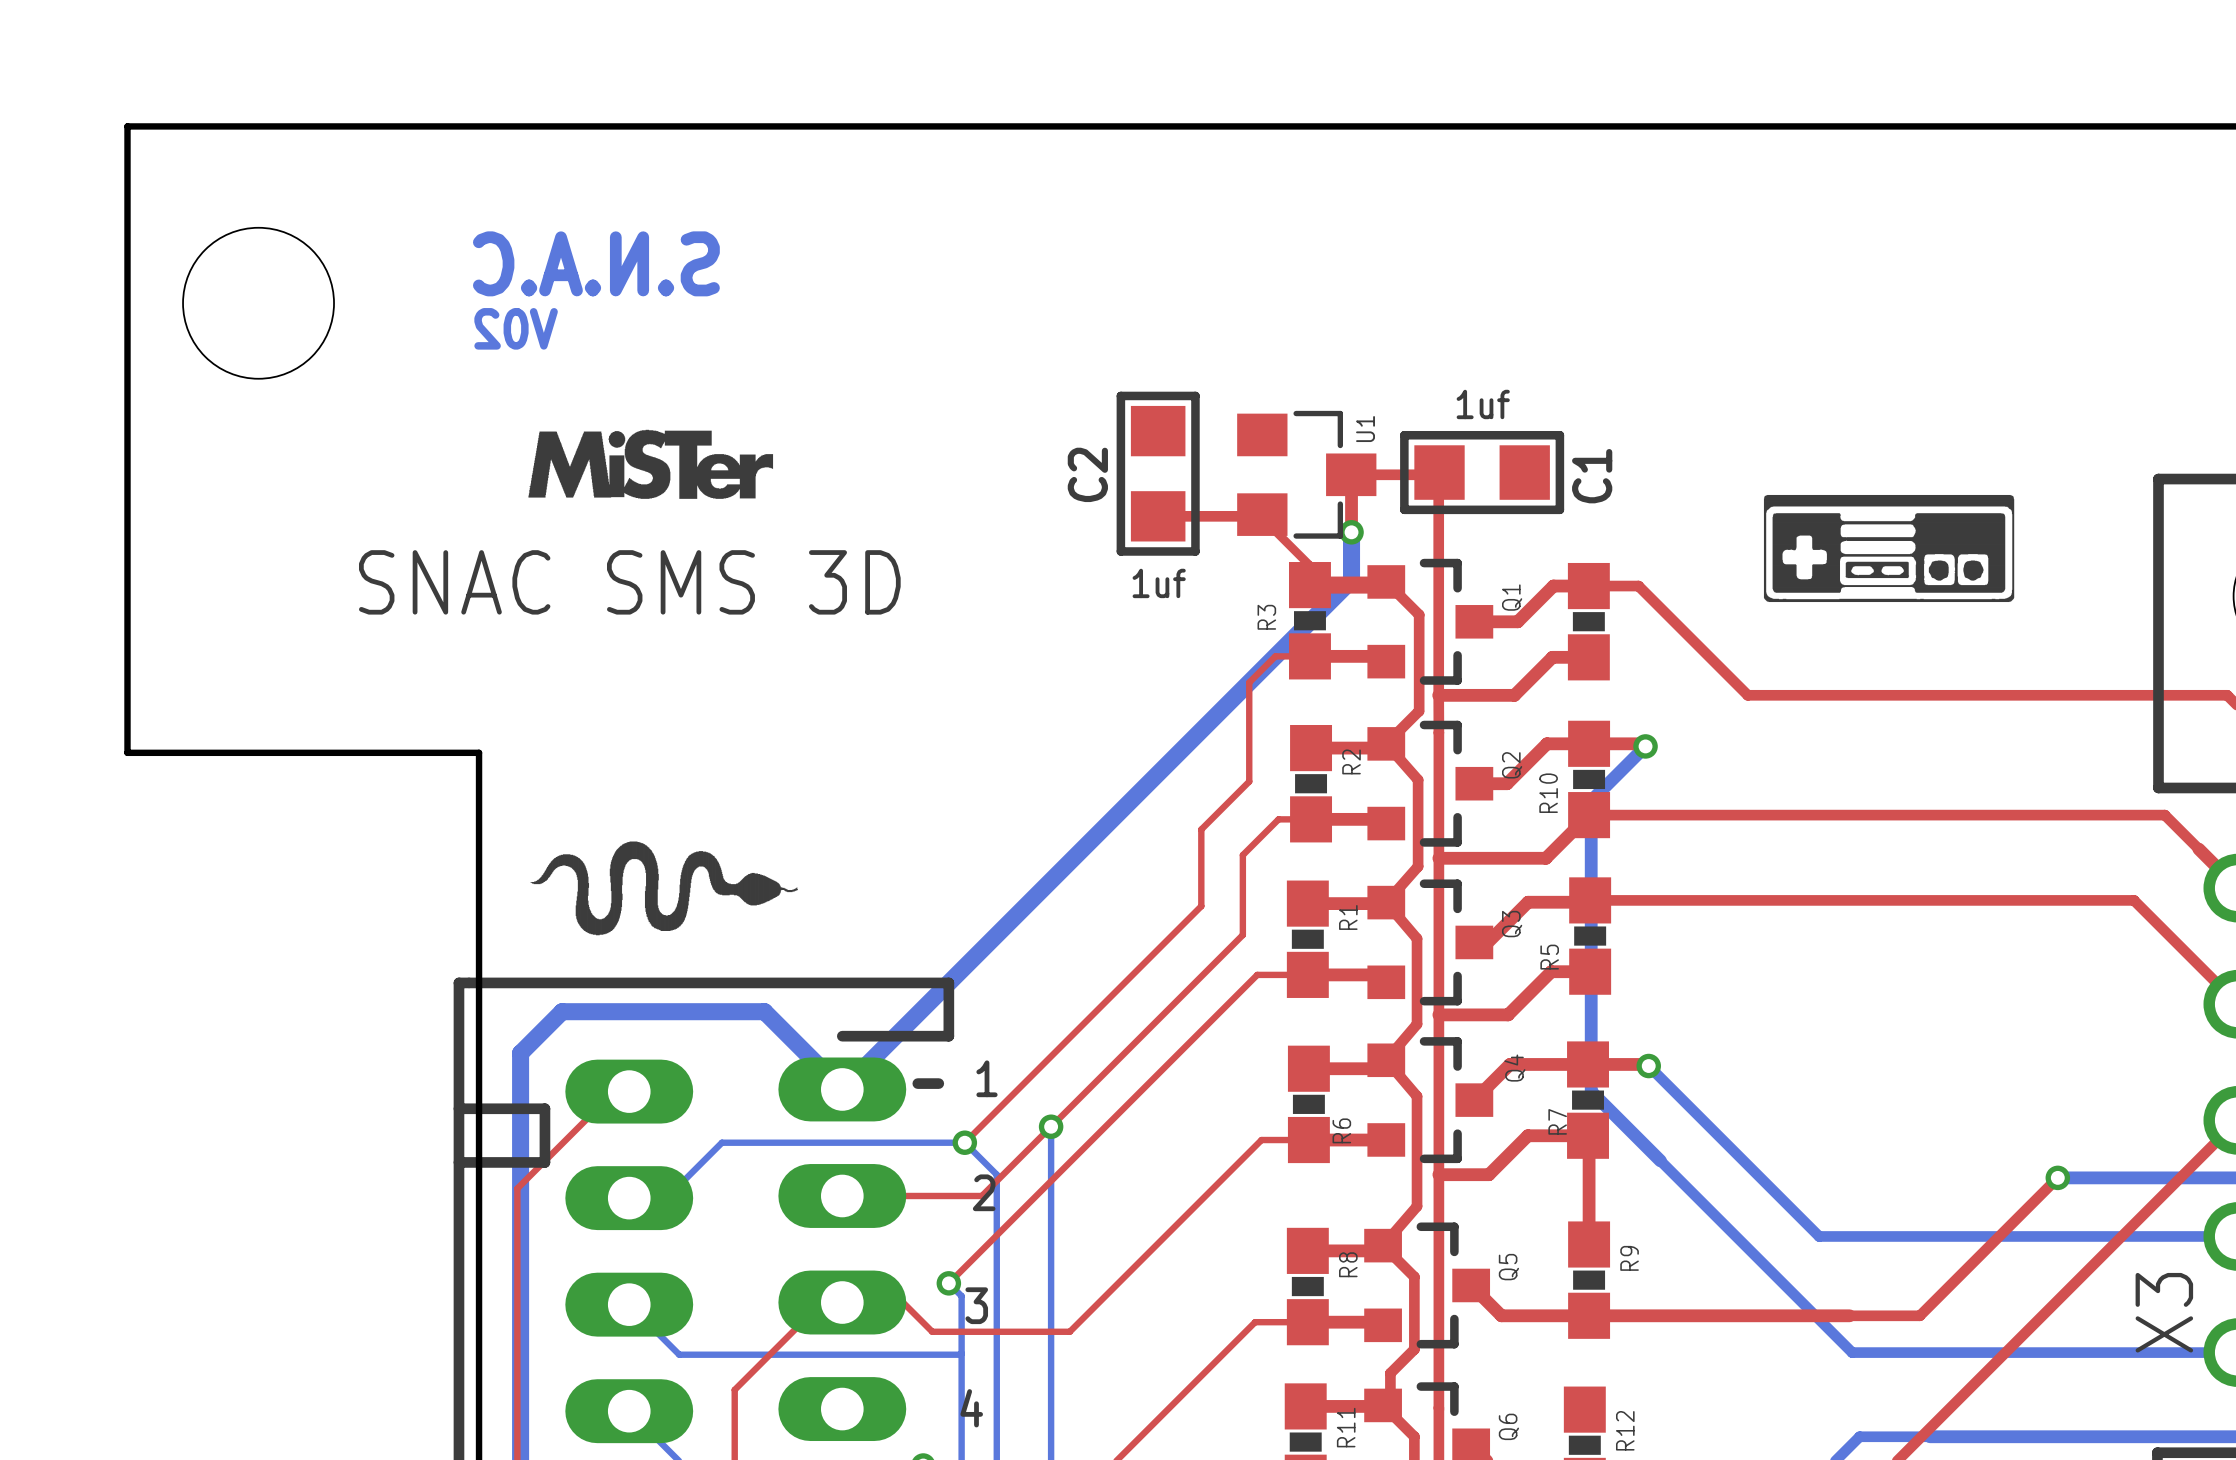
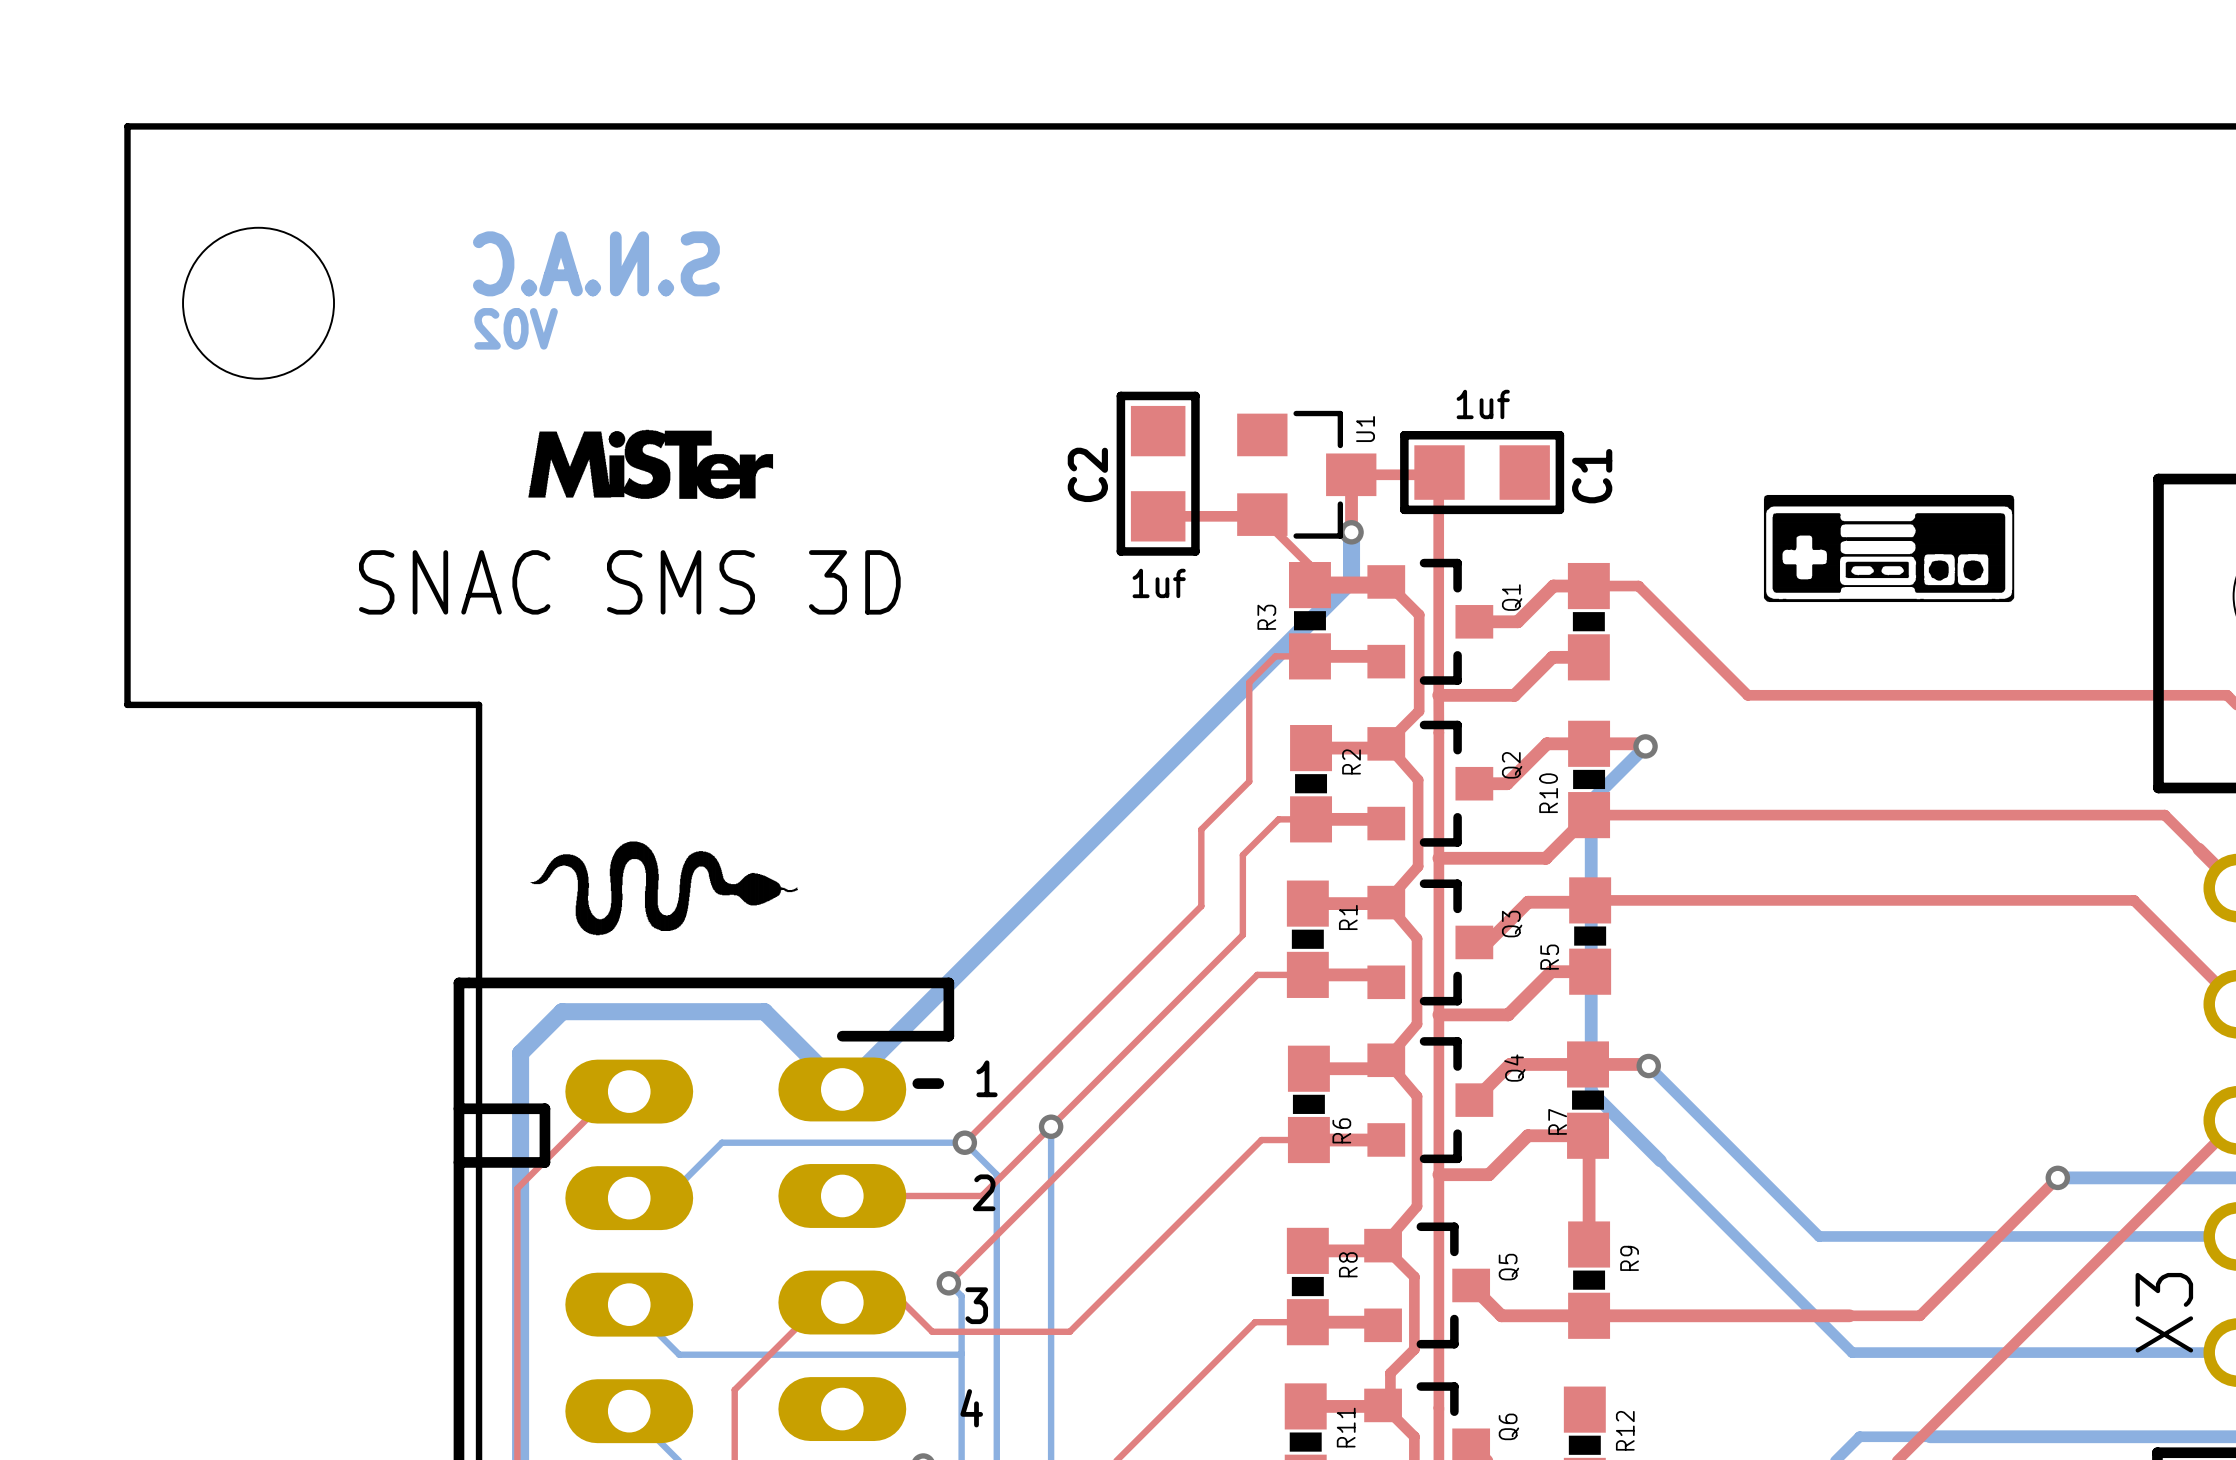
board edge: (127, 704) (127, 752) (479, 752) -> (127, 704) (479, 704) (479, 752)

